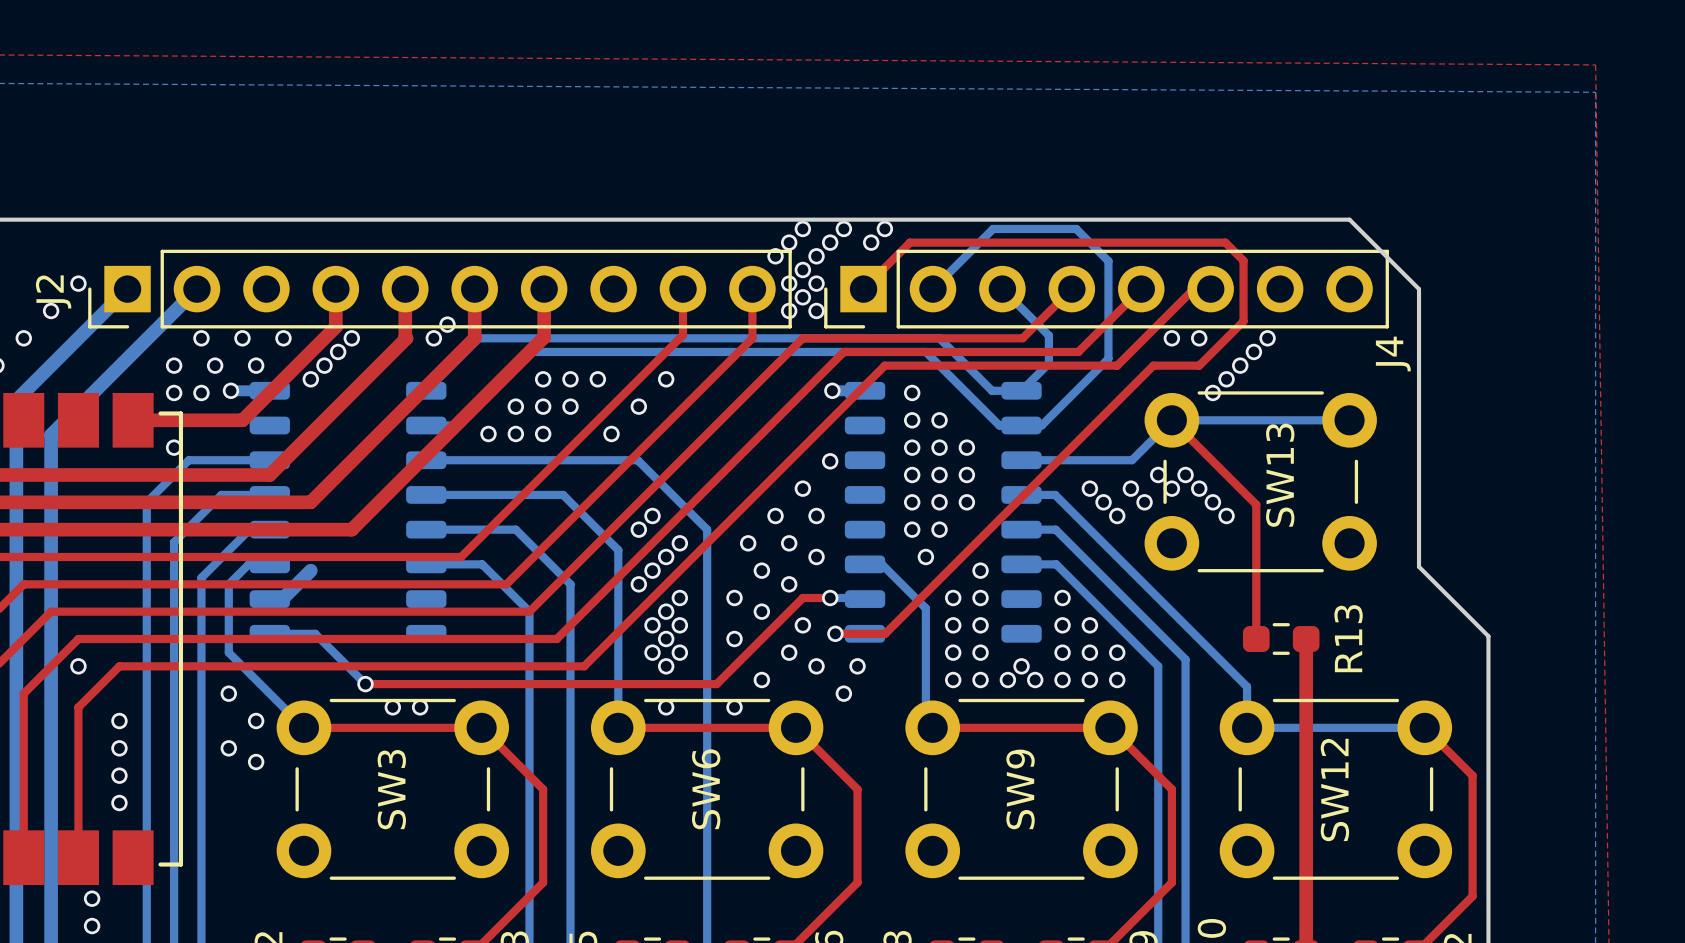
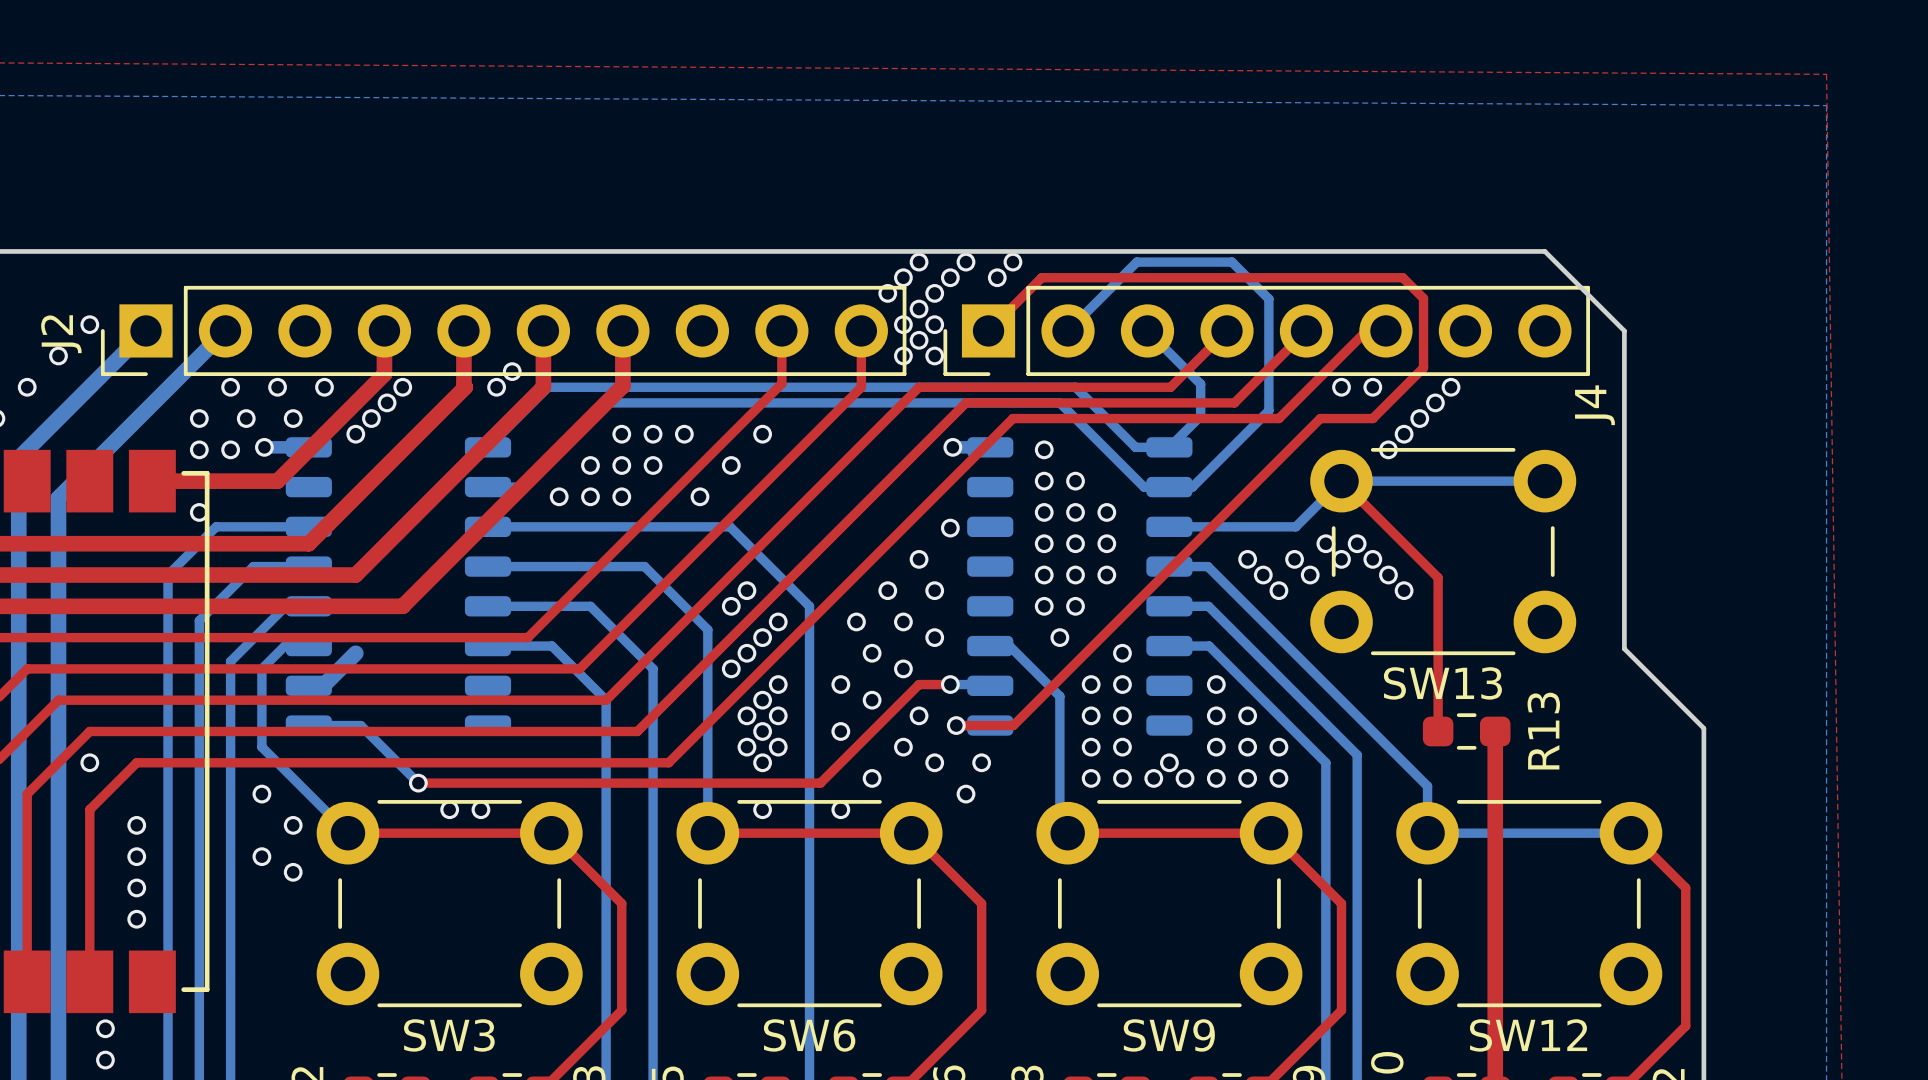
SW13 name rotation: 0° (1280, 475) -> 90° clockwise (1442, 683)
SW3 name rotation: 0° (391, 789) -> 90° clockwise (449, 1035)
SW3 name position: SW3 (391, 789) -> SW3 (449, 1035)
SW6 name rotation: 0° (706, 789) -> 90° clockwise (809, 1035)
SW6 name position: SW6 (706, 789) -> SW6 (809, 1035)
SW9 name rotation: 0° (1020, 789) -> 90° clockwise (1169, 1035)
SW9 name position: SW9 (1020, 789) -> SW9 (1169, 1035)
SW12 name rotation: 0° (1334, 789) -> 90° clockwise (1528, 1035)

